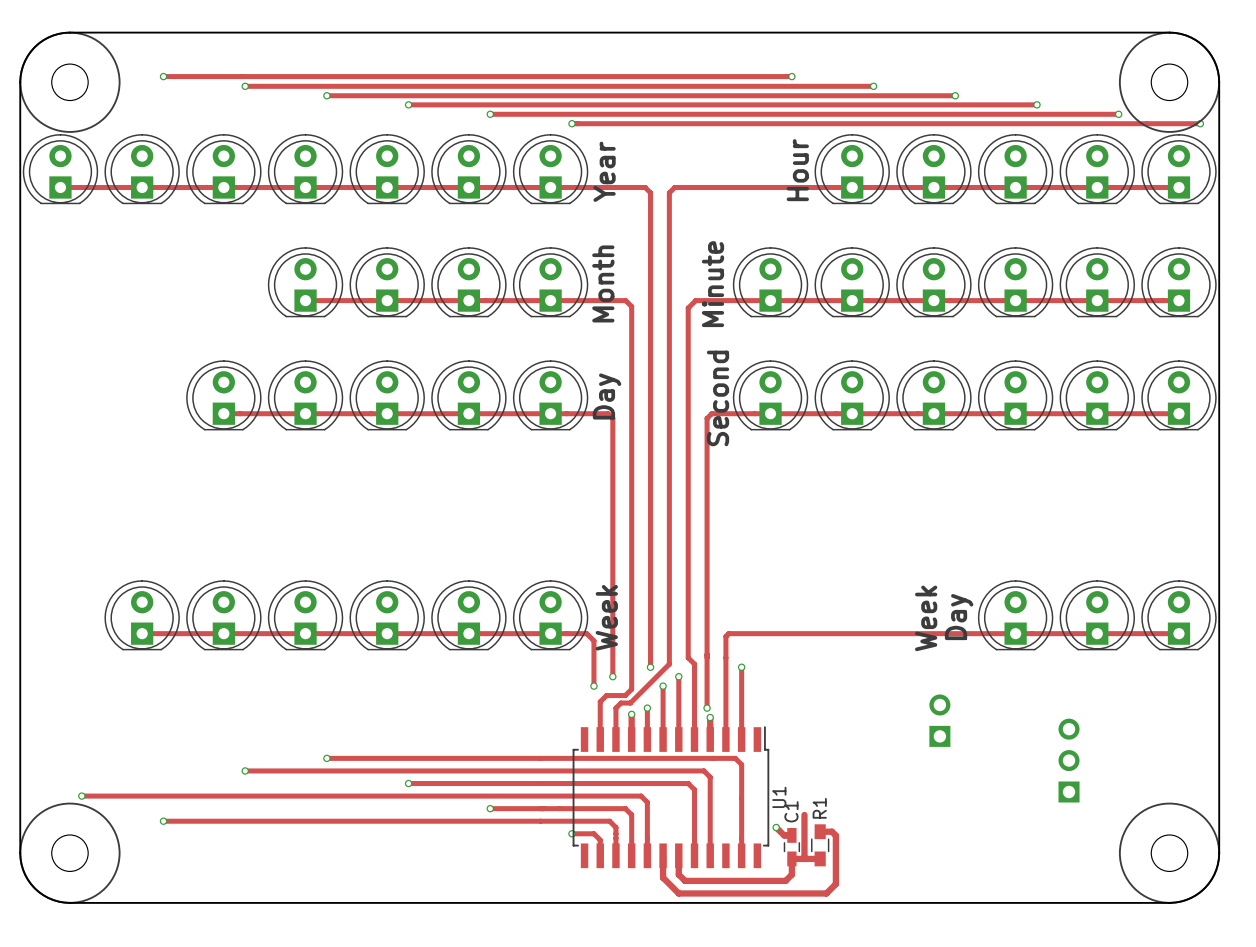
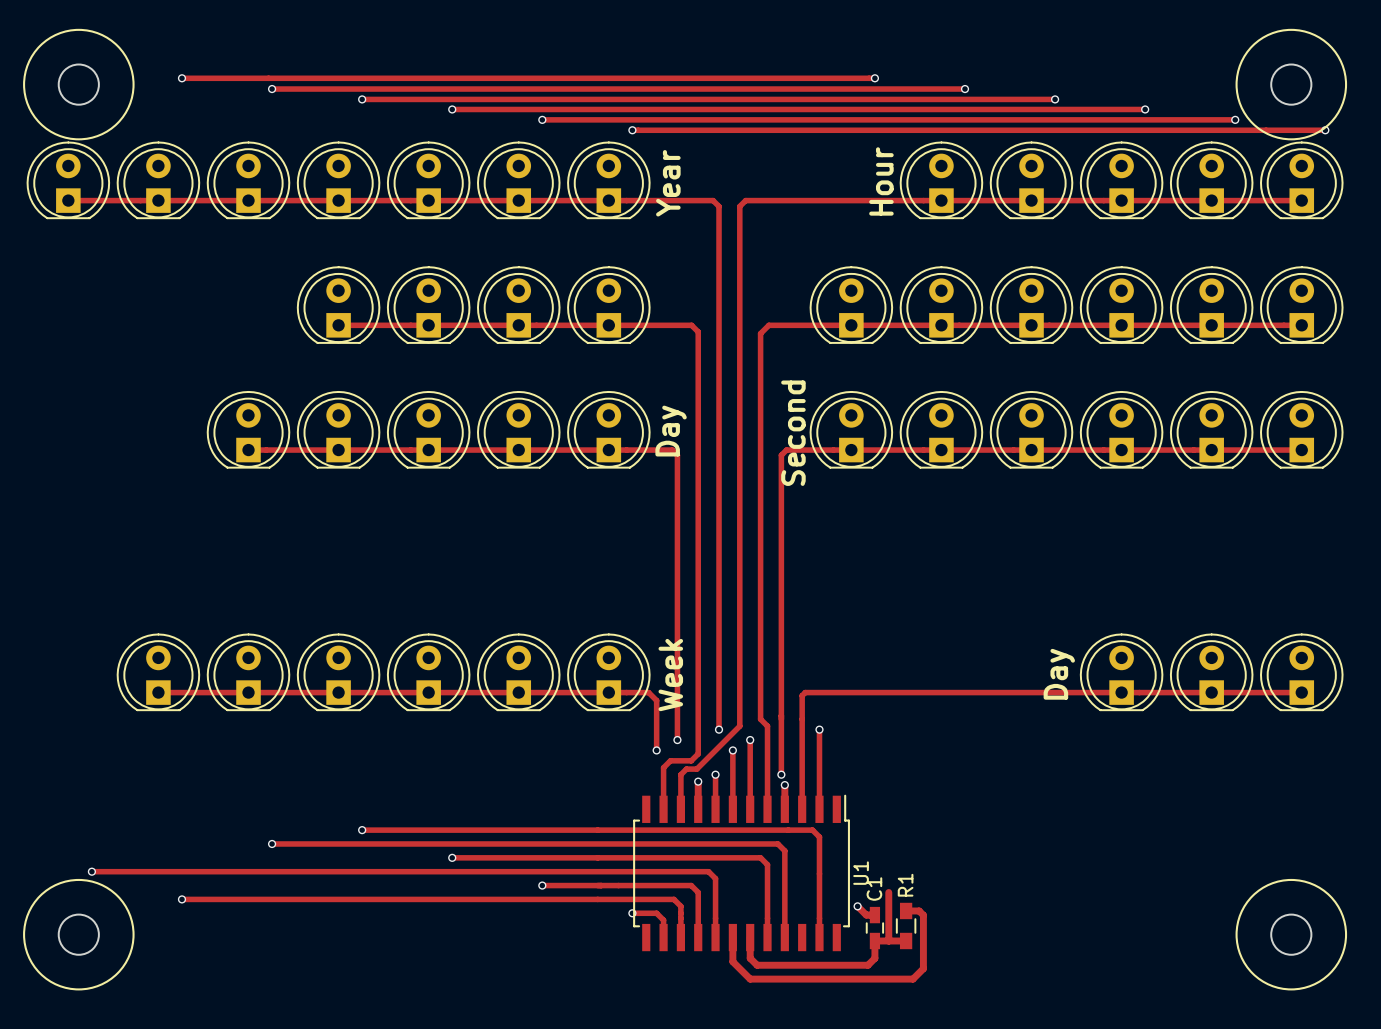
board edge: (69, 32) (1169, 32) (1185, 35) (1200, 43) (1214, 60) (1219, 82) (1219, 853) (1216, 869) (1208, 884) (1191, 897) (1169, 902) (69, 902) (53, 900) (38, 892) (25, 874) (20, 853) (20, 82) (25, 60) (34, 47) (48, 37) (69, 32) -> none
text: Month (603, 283) -> none
text: Minute (712, 284) -> none
text: Week (926, 618) -> none
part: (939, 720) -> none
part: (1069, 760) -> none

